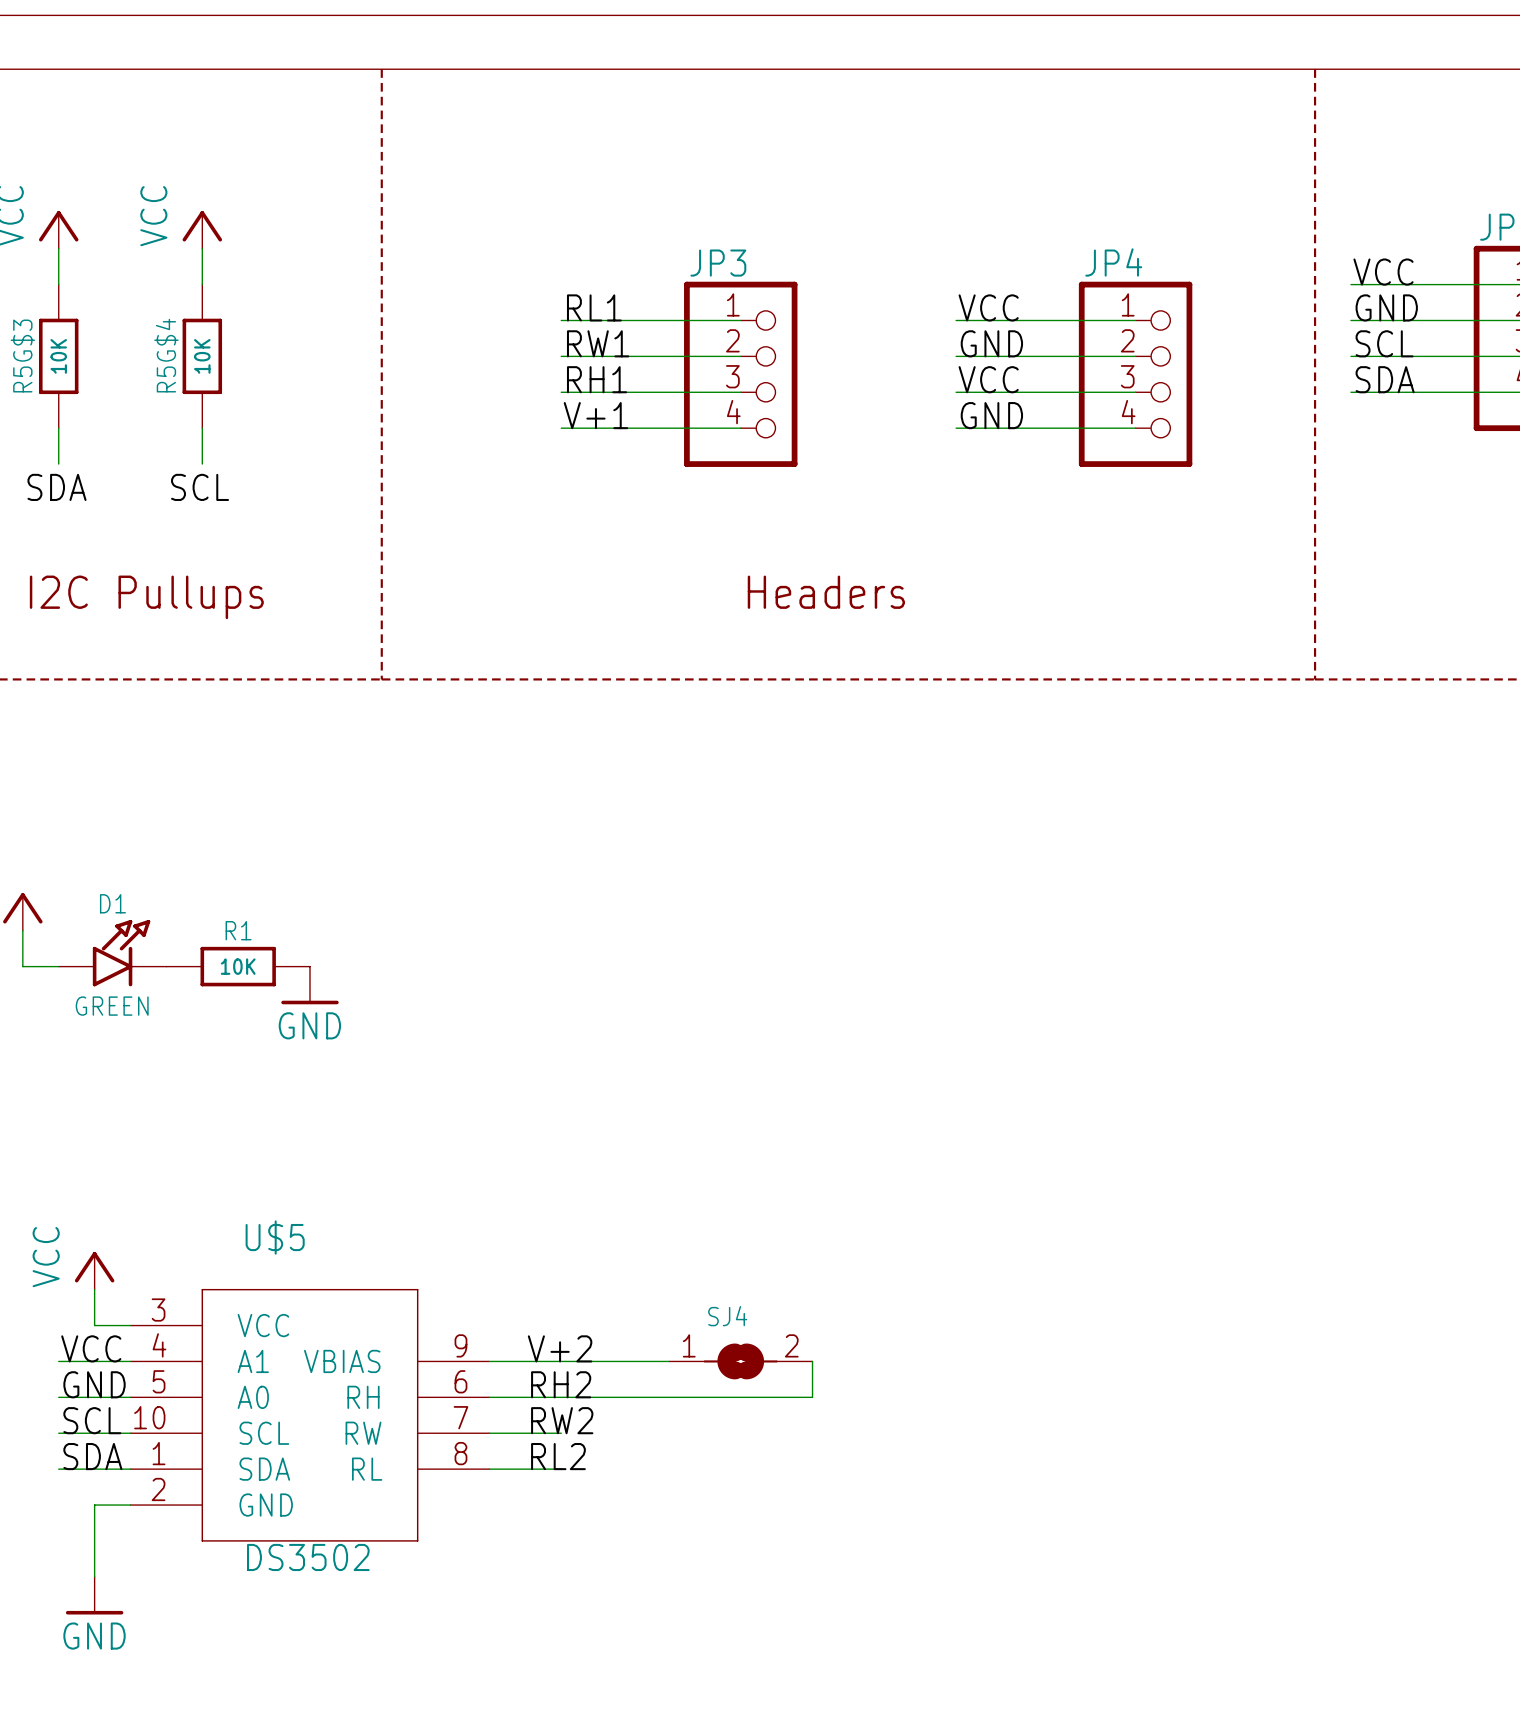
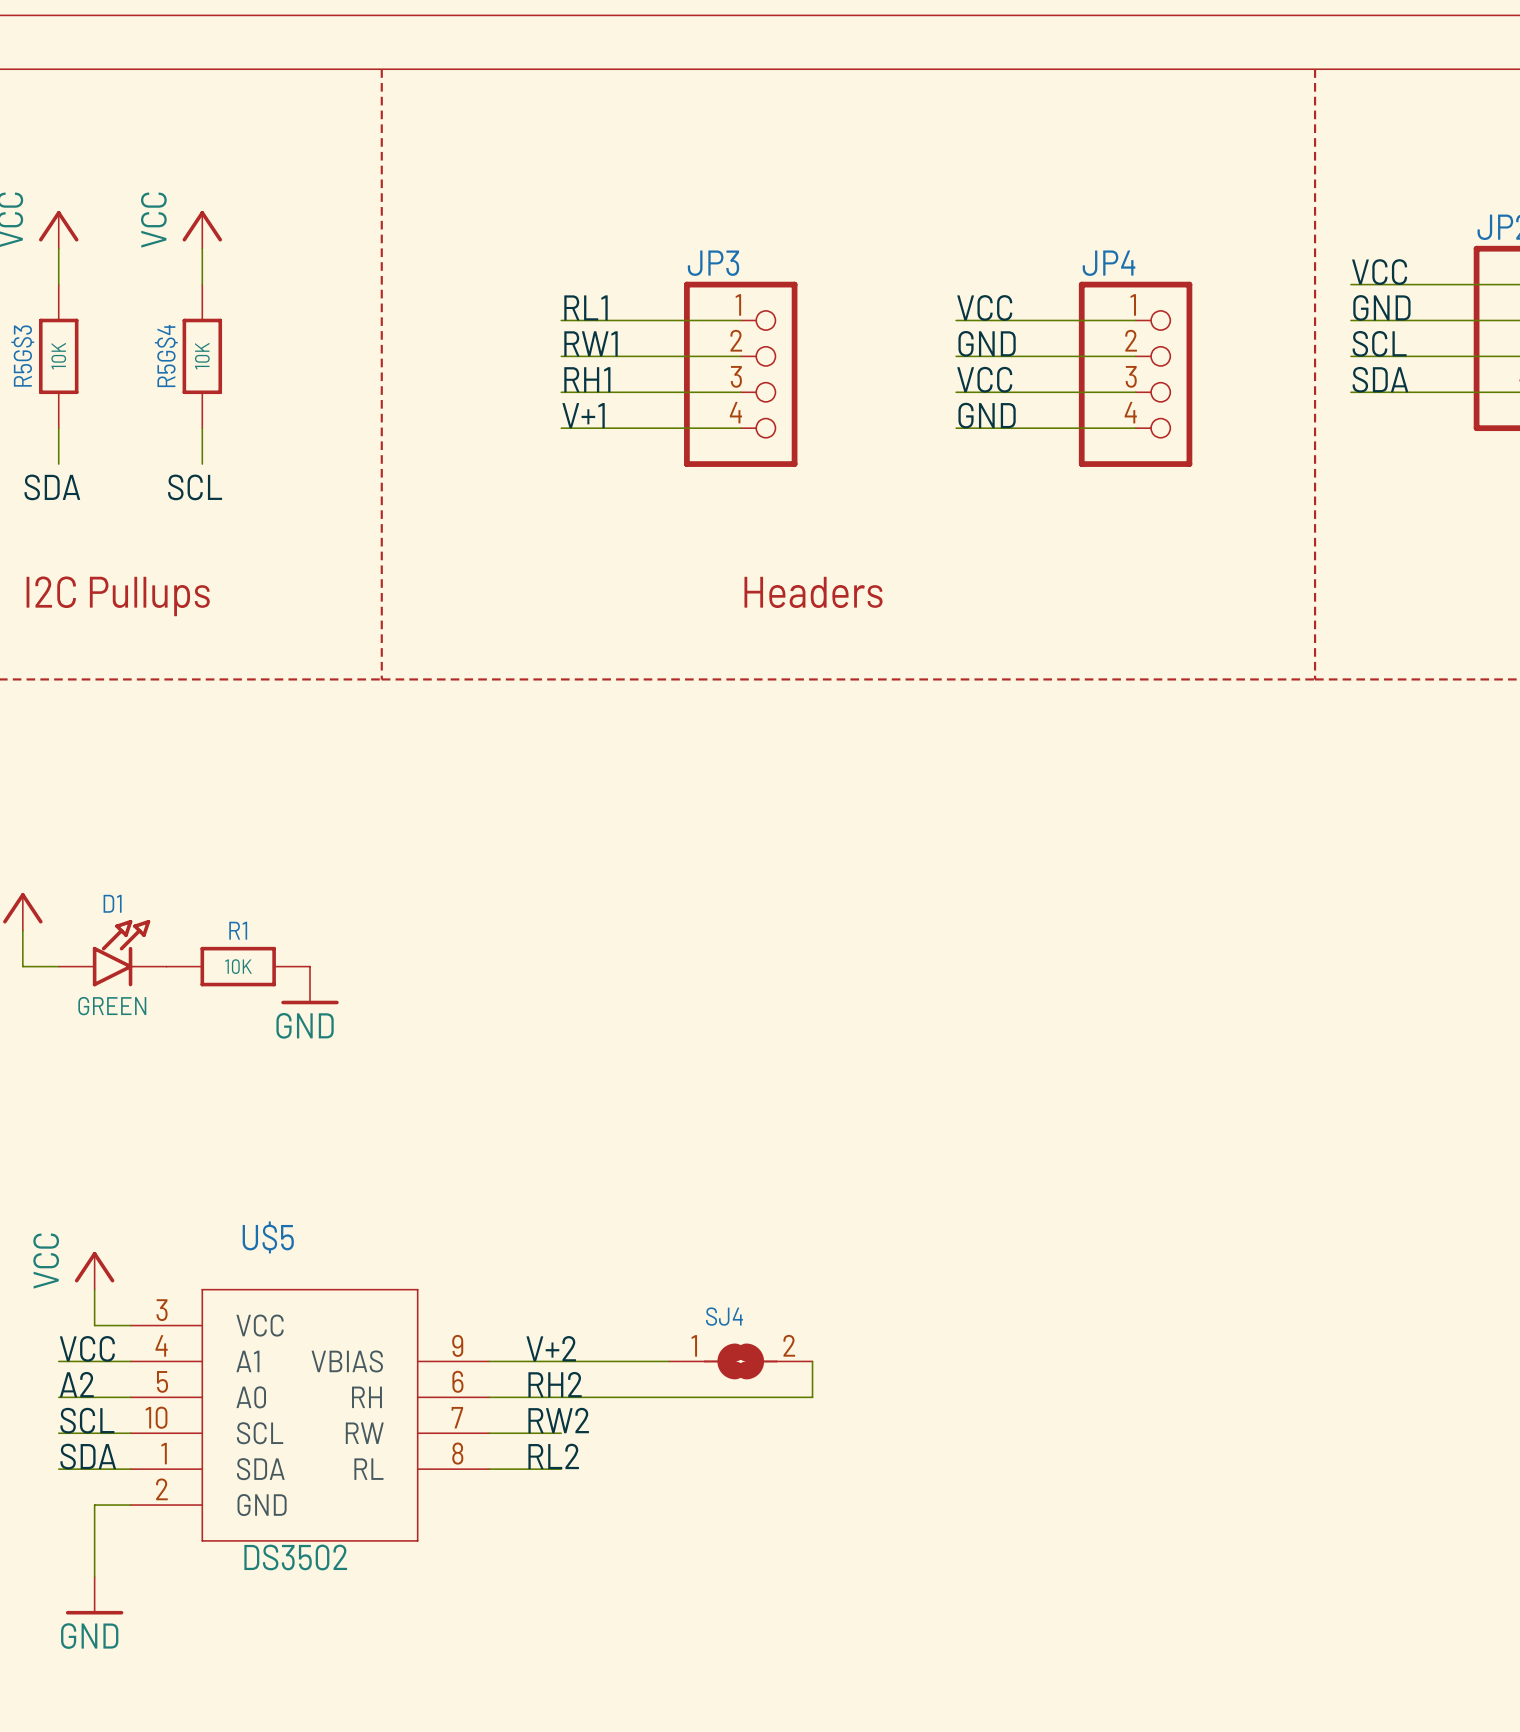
label: GND (94, 1384) -> A2 (76, 1384)

